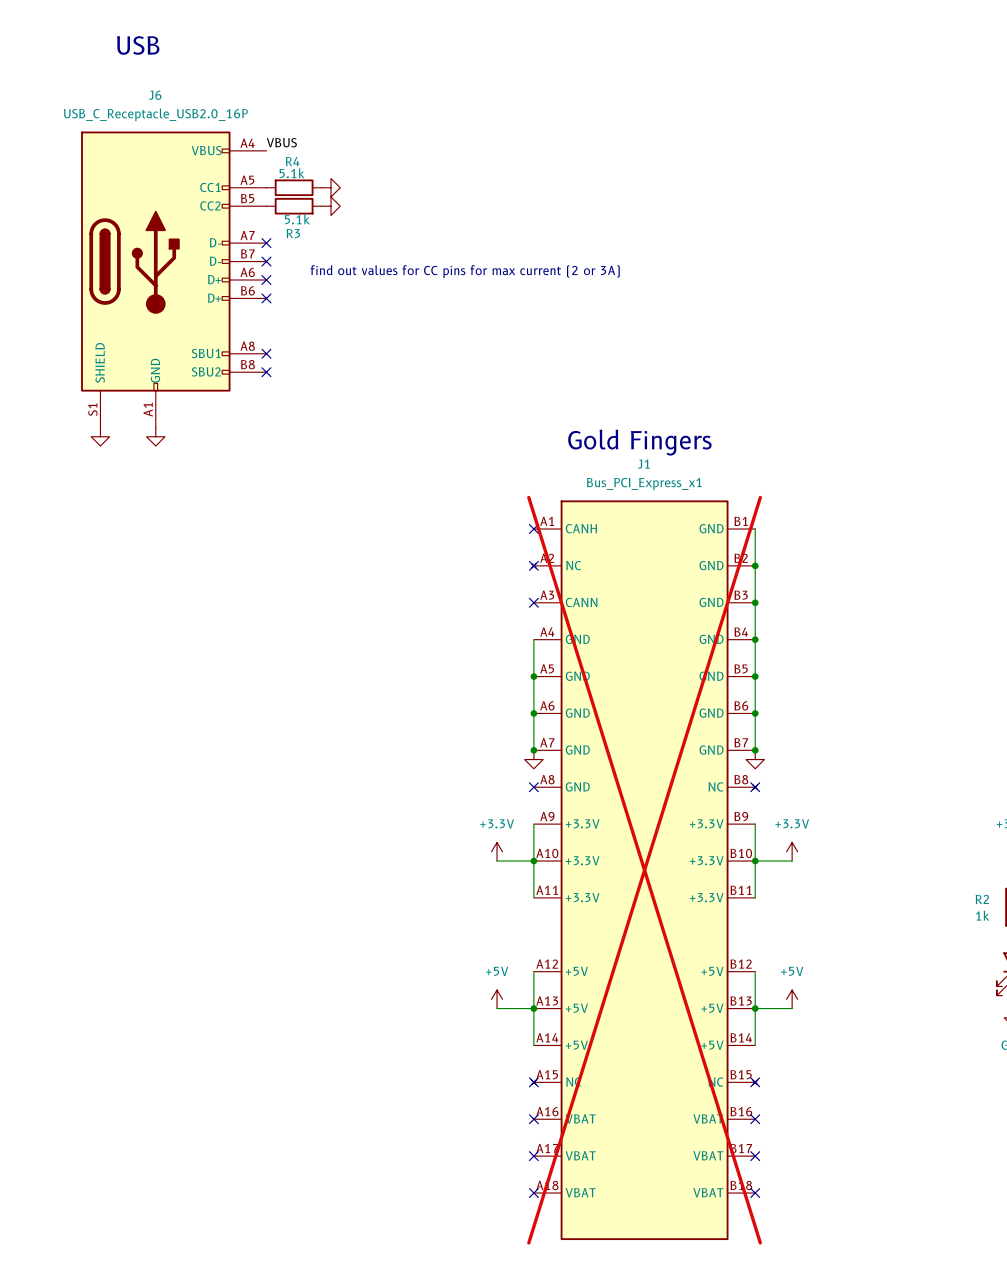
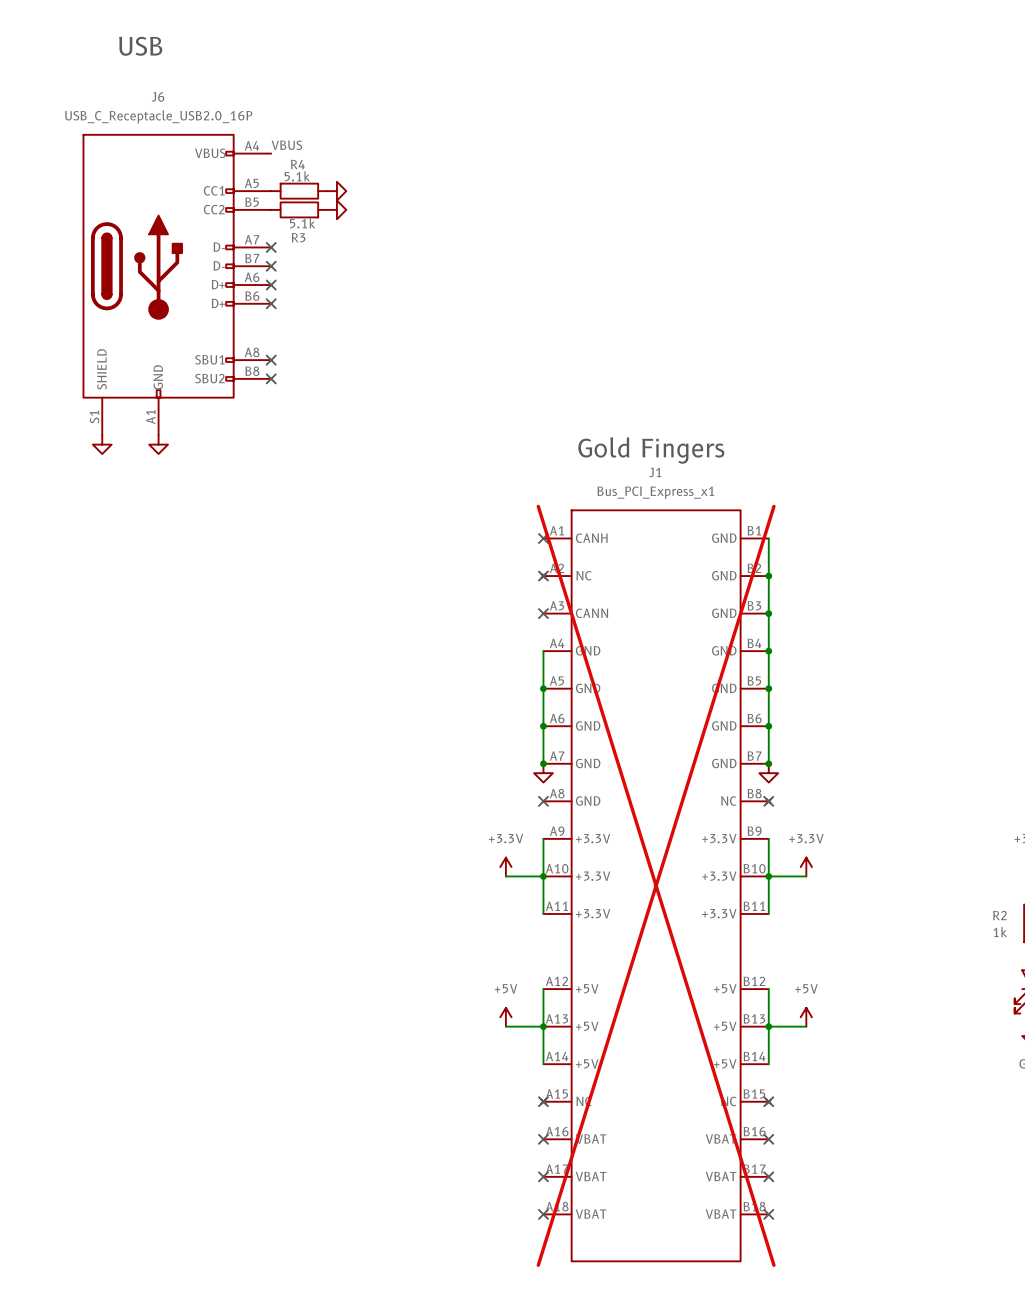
text: find out values for CC pins for max current (2 or 3A) (465, 271) -> none

